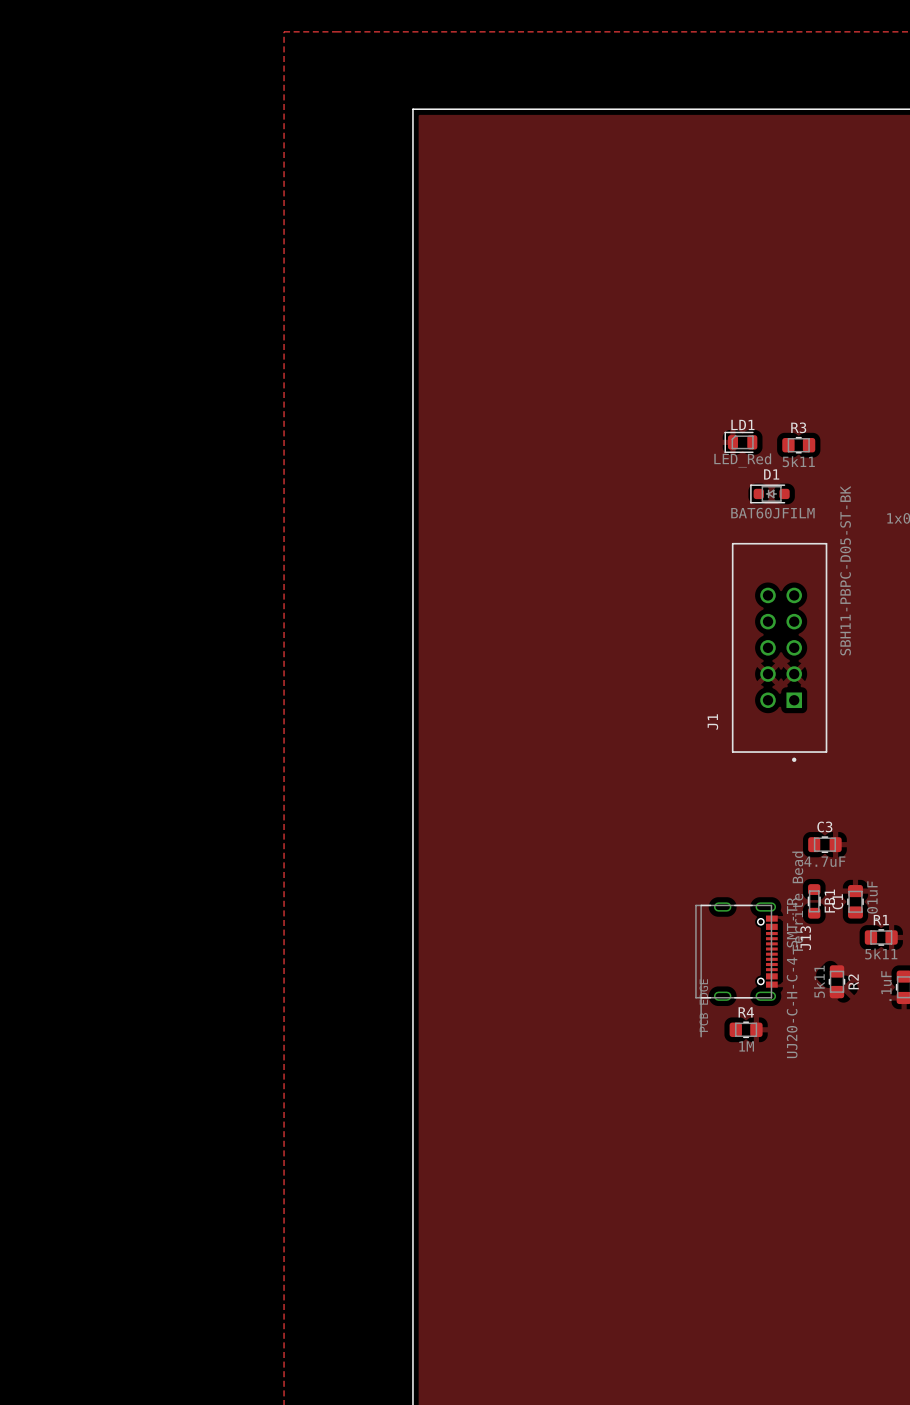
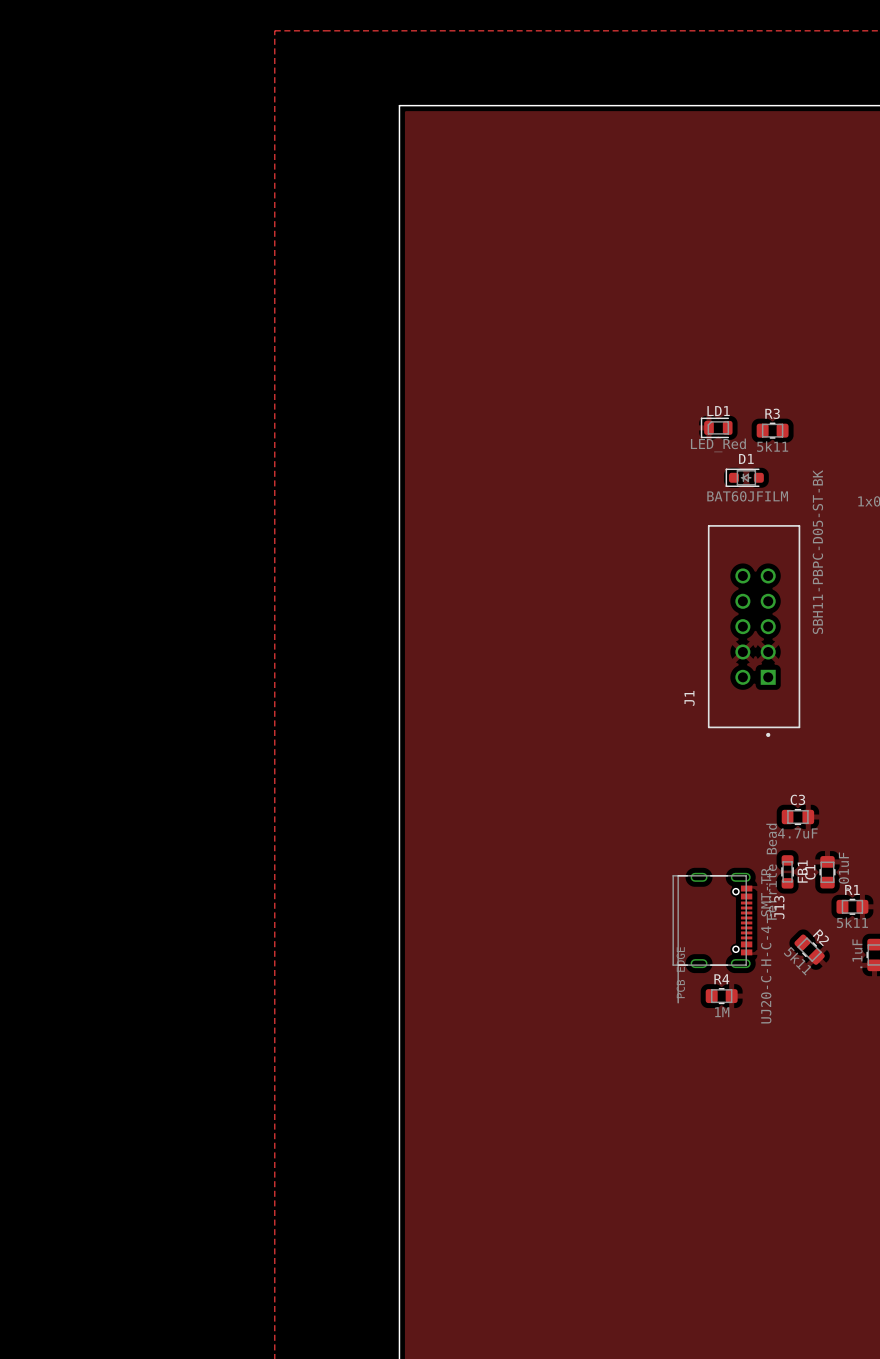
R2 rotation: 0° (836, 981) -> 45° counterclockwise (809, 949)

